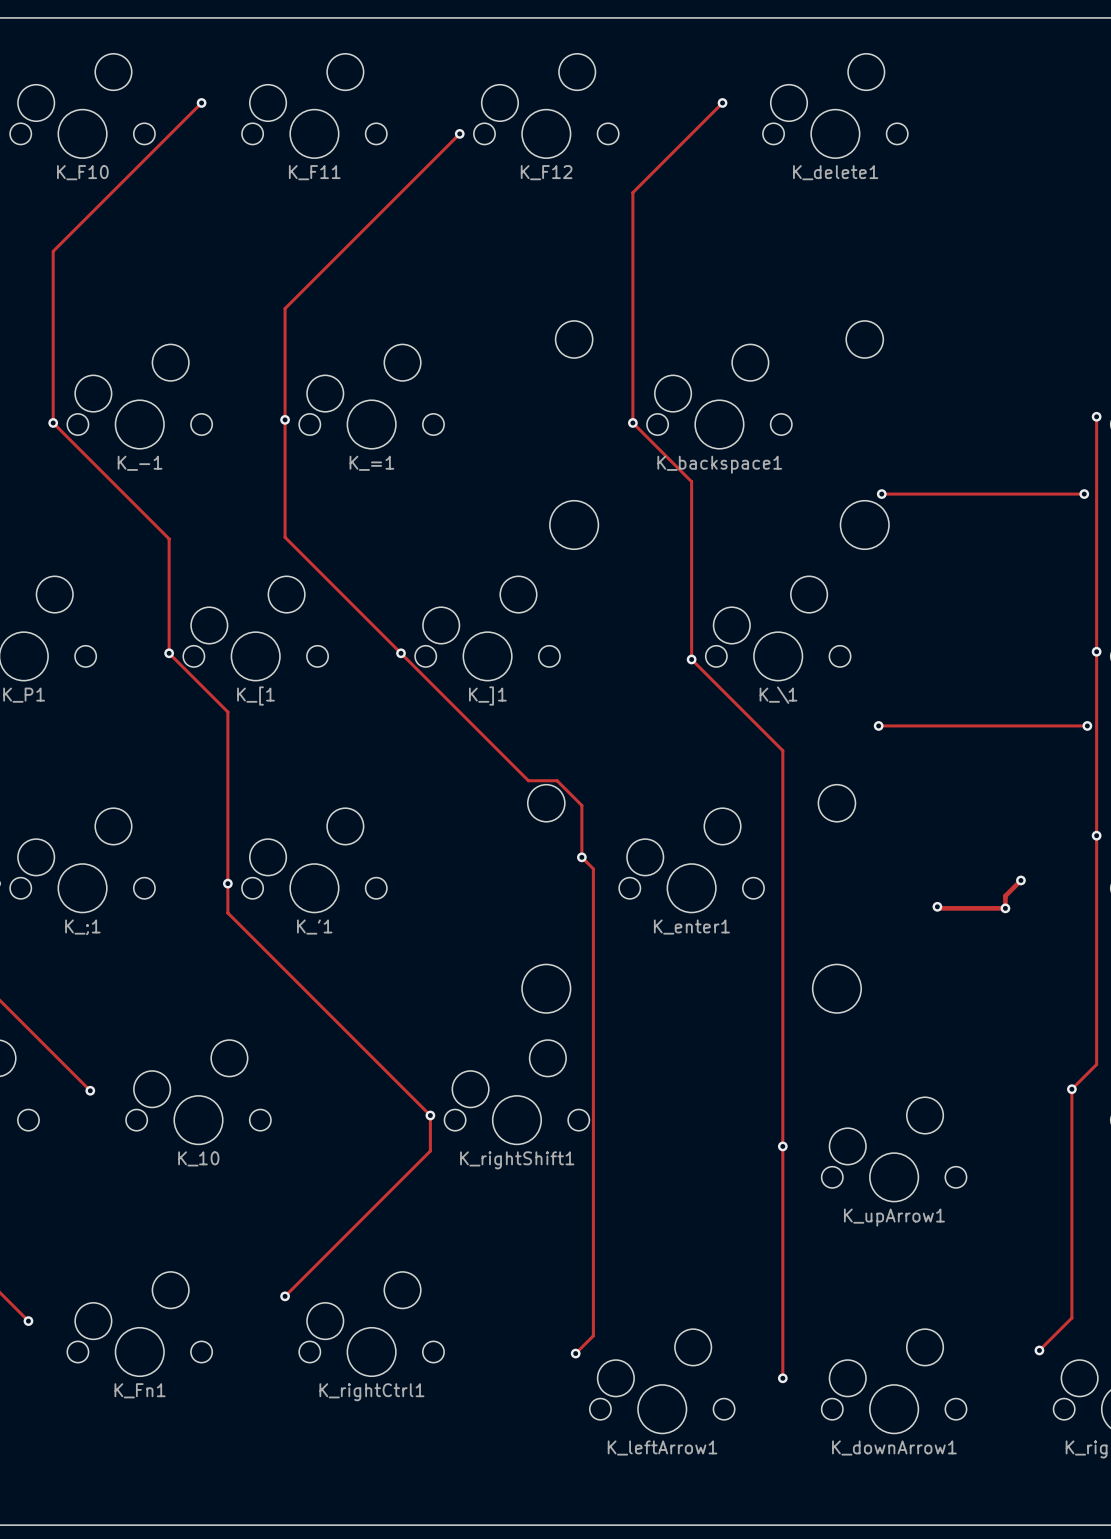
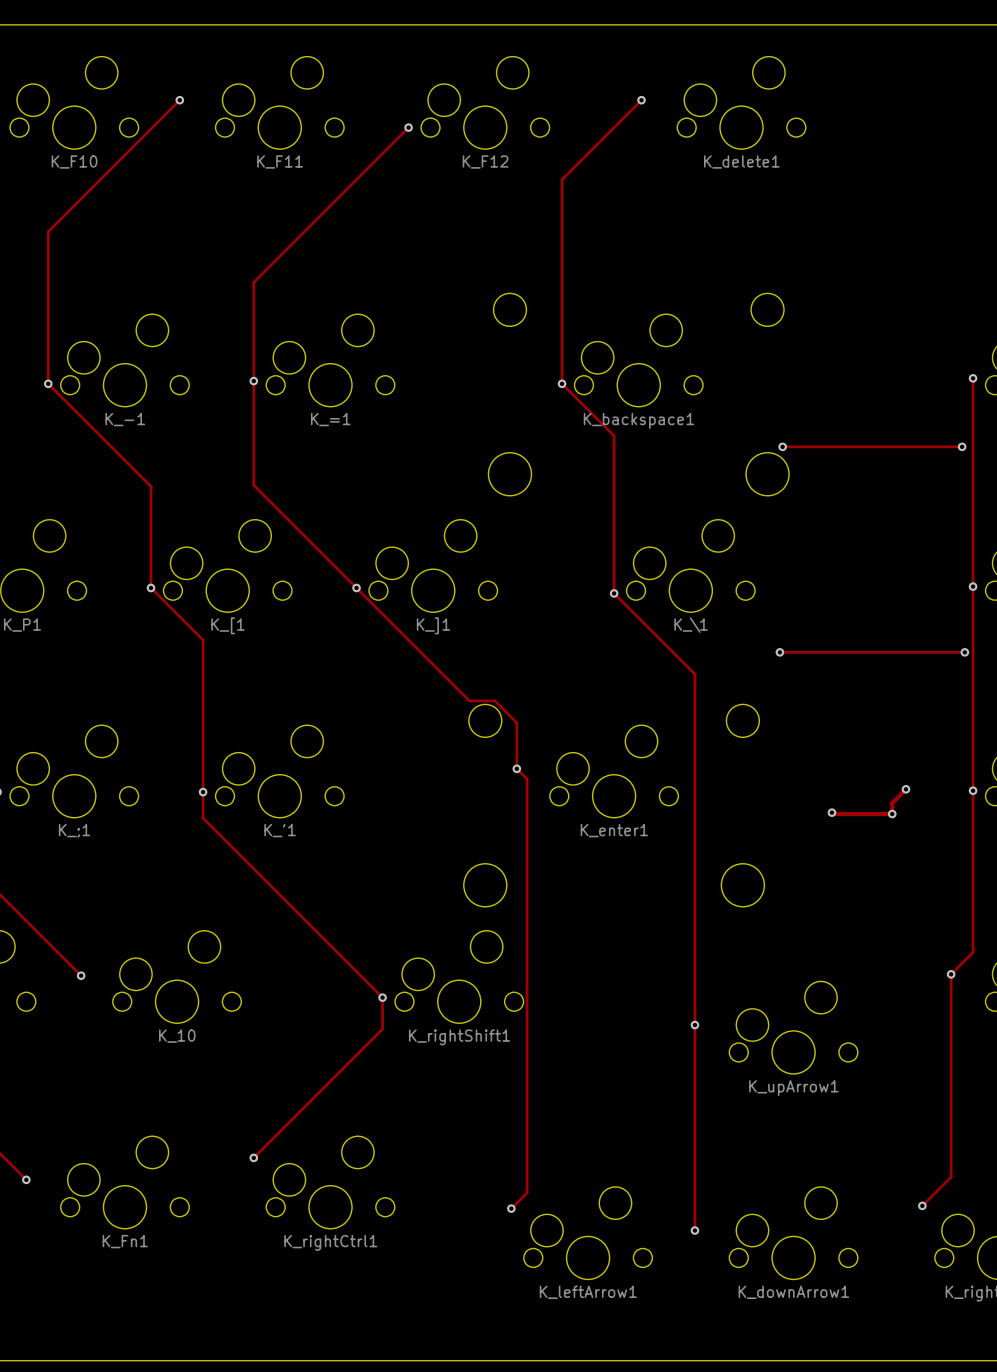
via position: (1096, 835) -> (973, 790)

